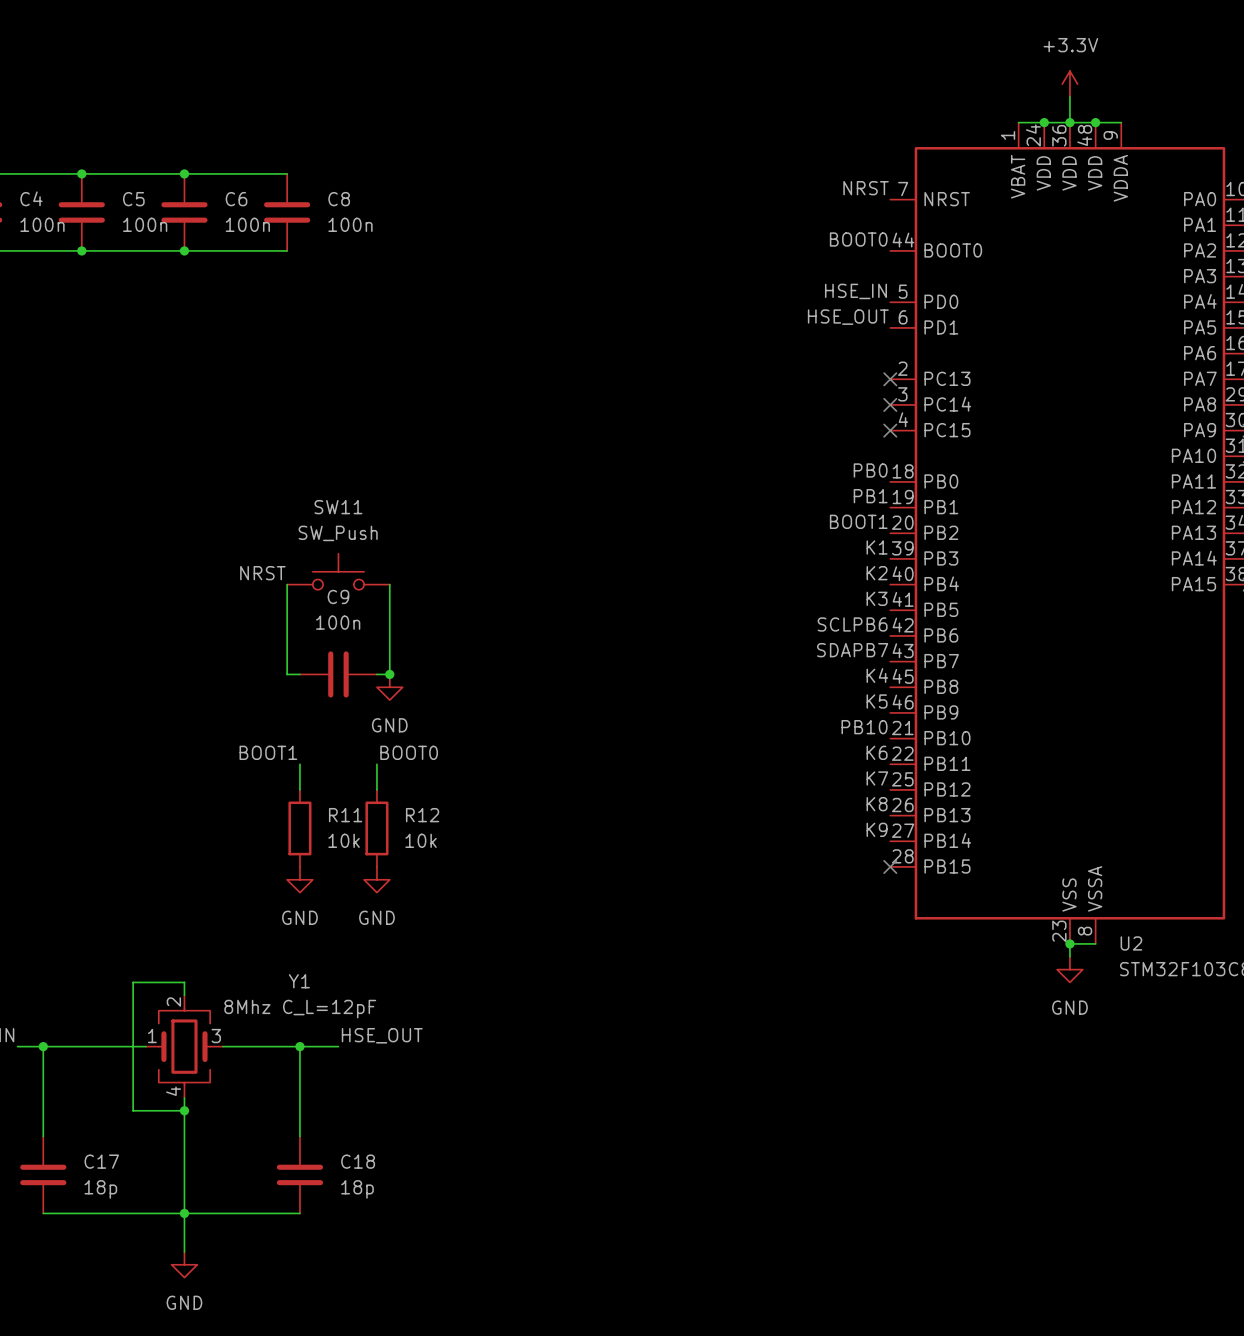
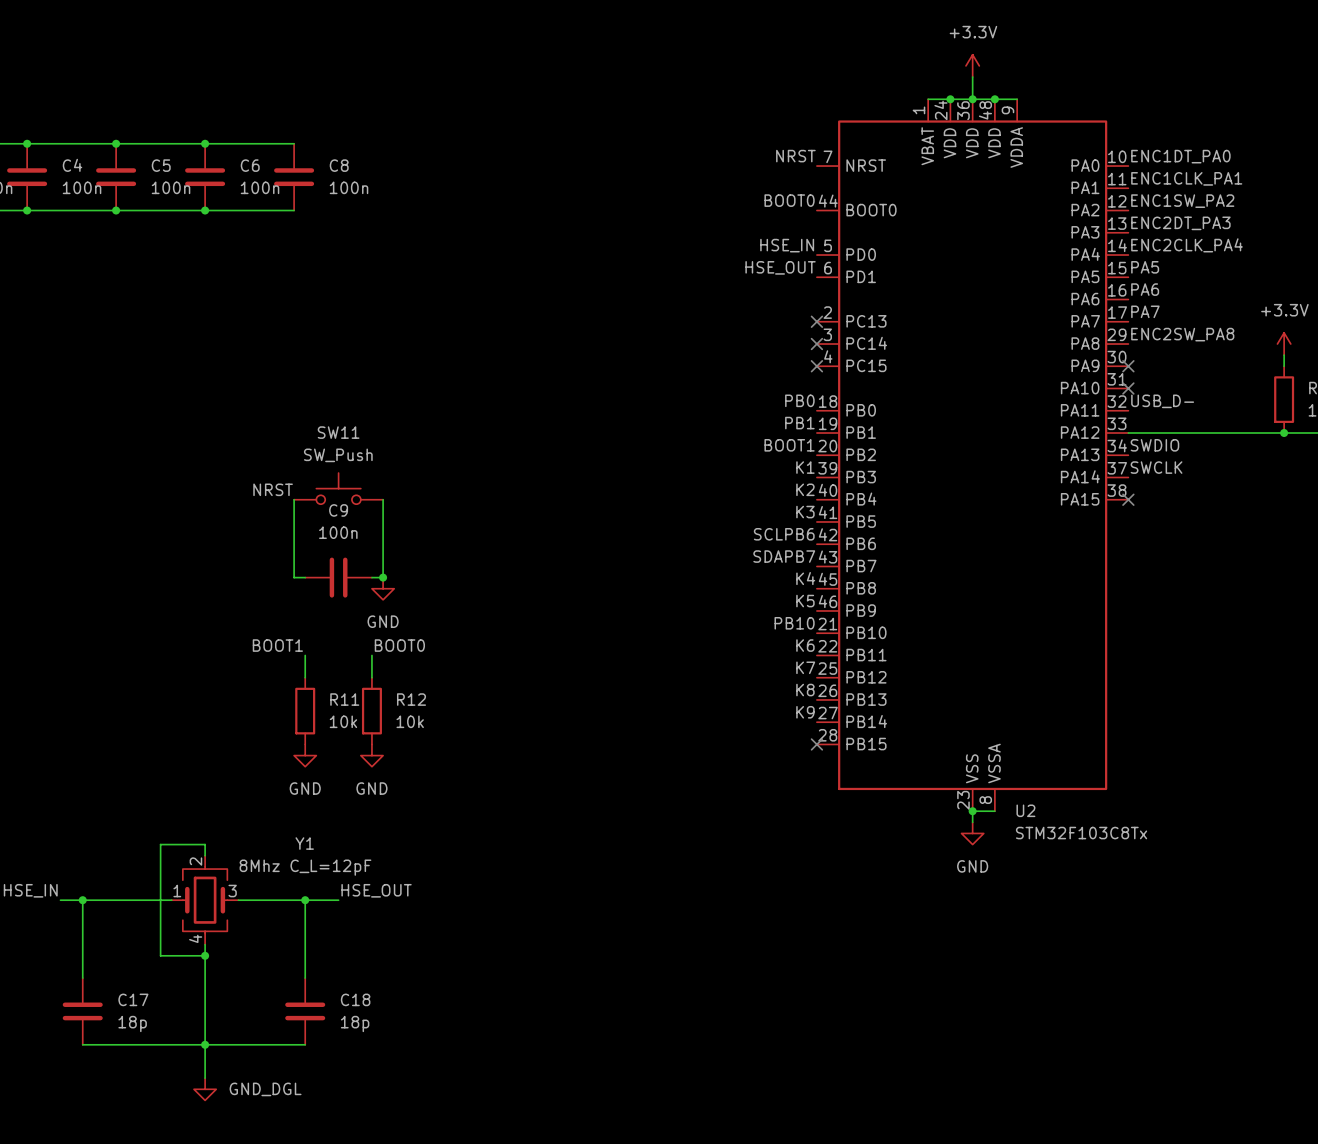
power symbol: GND (184, 1264) -> GND_DGL (205, 1089)

